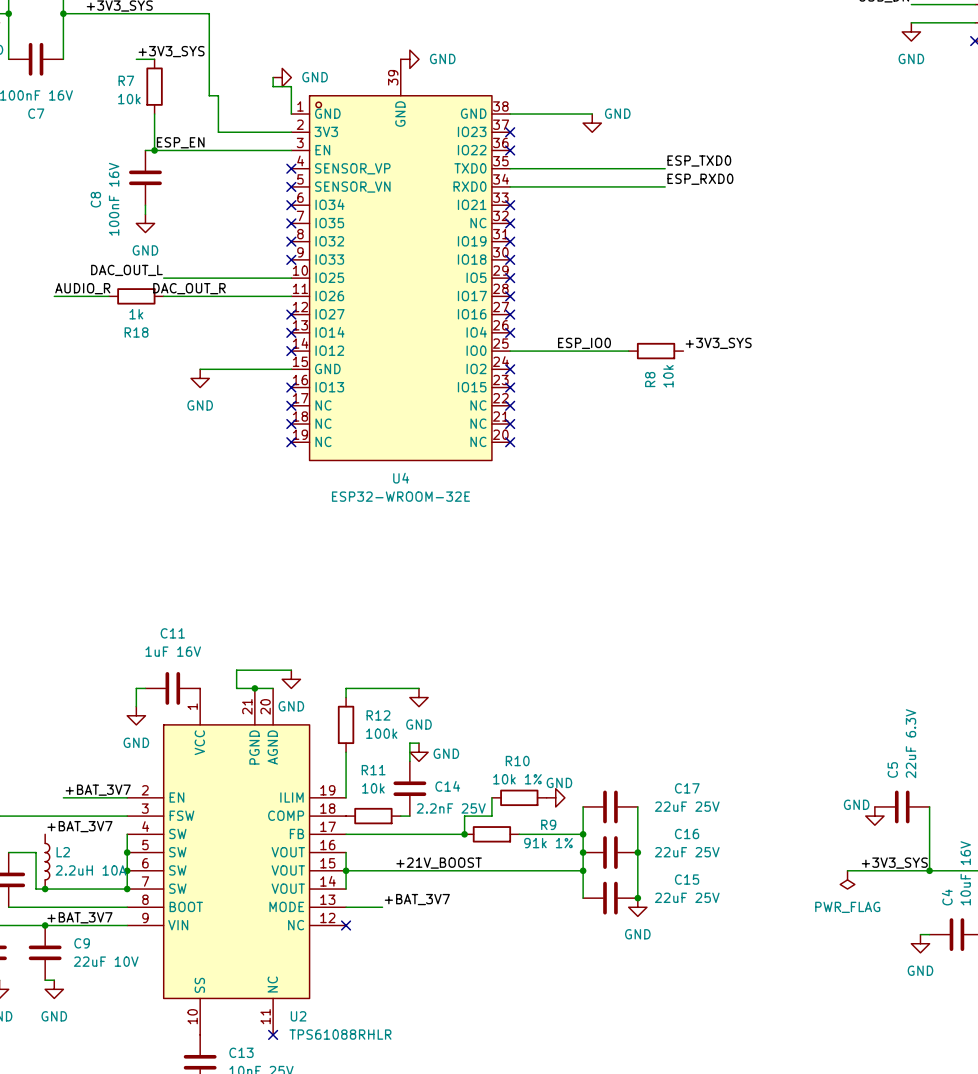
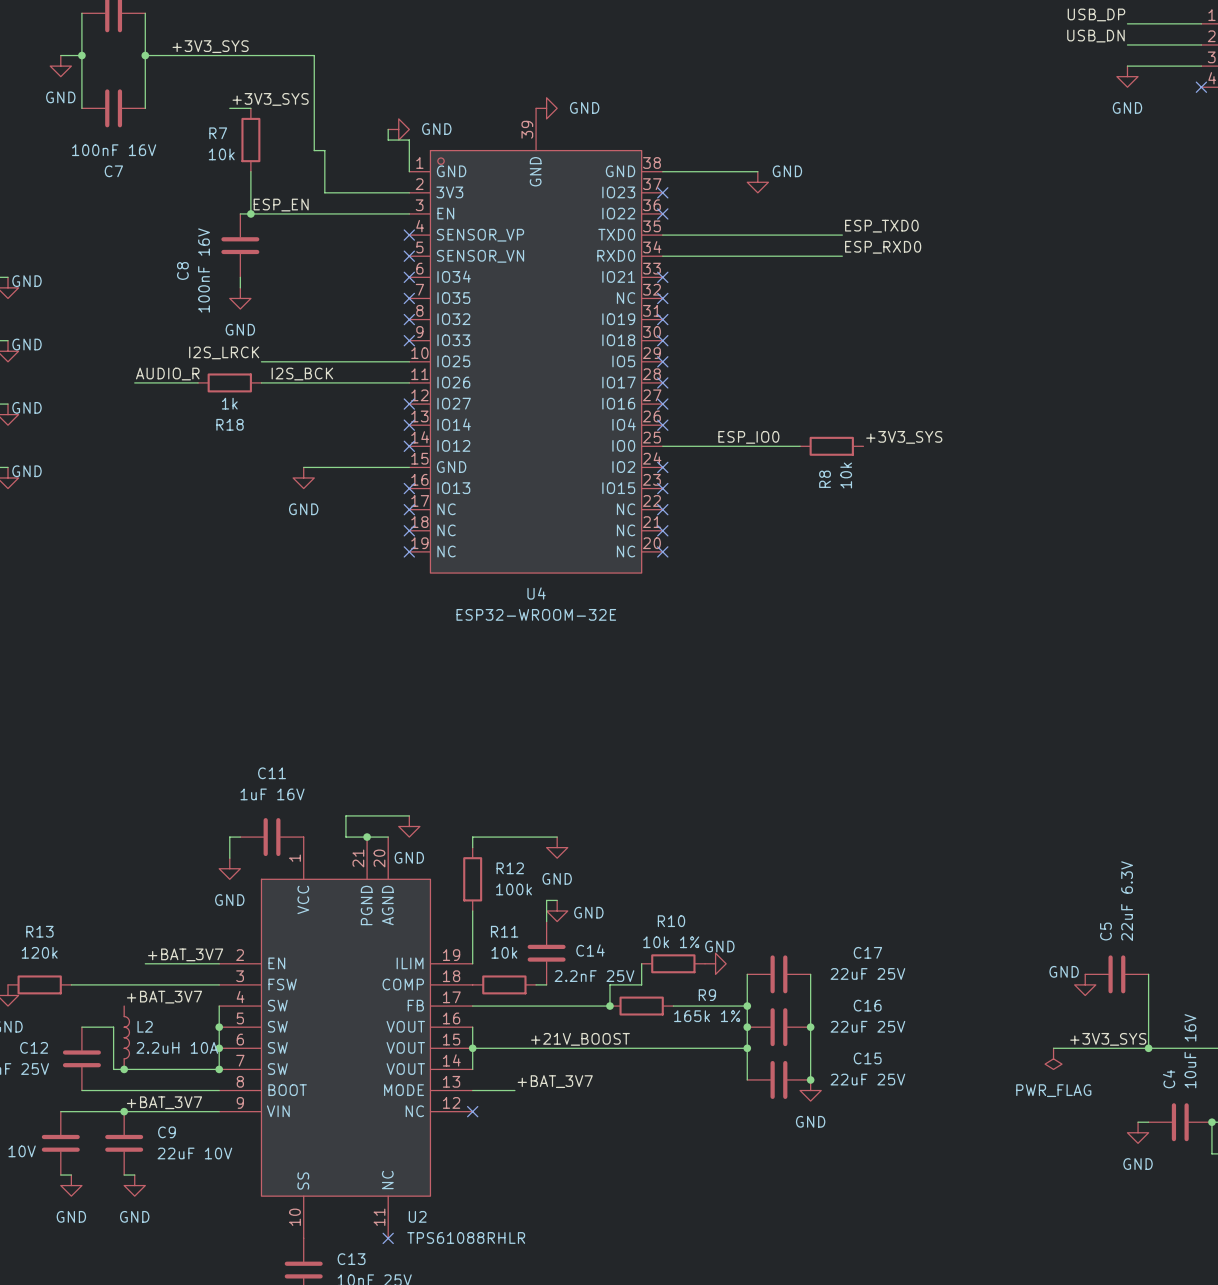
label: DAC_OUT_L (126, 270) -> I2S_LRCK (224, 352)
label: DAC_OUT_R (189, 288) -> I2S_BCK (302, 374)
R9 value: 91k 1% (548, 843) -> 165k 1% (707, 1016)

